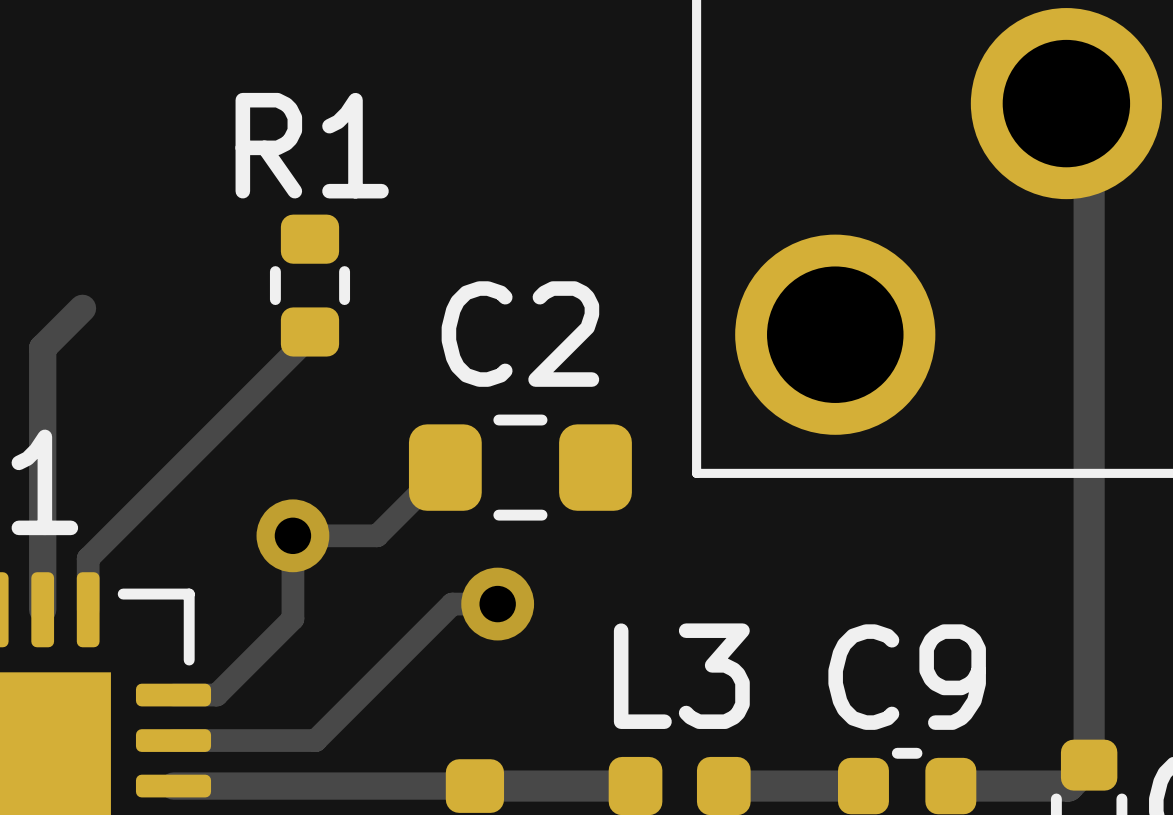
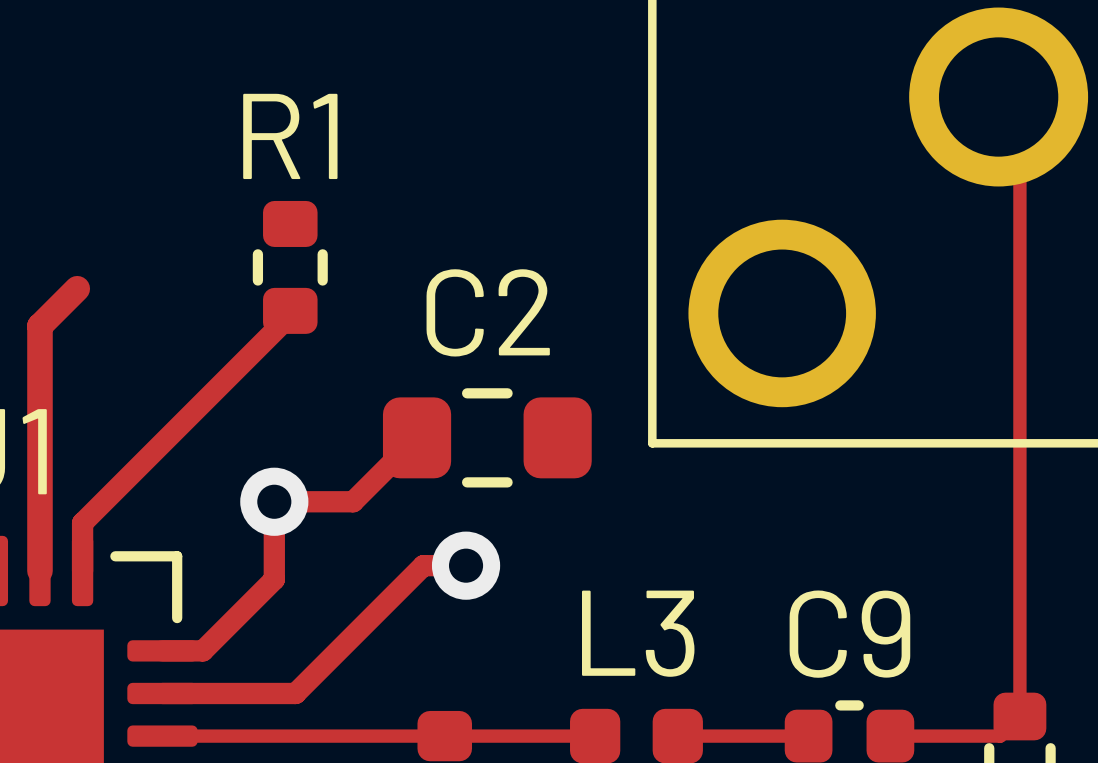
track width: thick (1066, 103) (1089, 126) (1089, 765) (1068, 786) (950, 786) -> thin (998, 97) (1019, 118) (1019, 716) (1000, 736) (890, 736)
track width: thick (173, 786) (635, 786) -> thin (162, 736) (595, 736)
track width: thick (723, 786) (863, 786) -> thin (677, 736) (808, 736)

